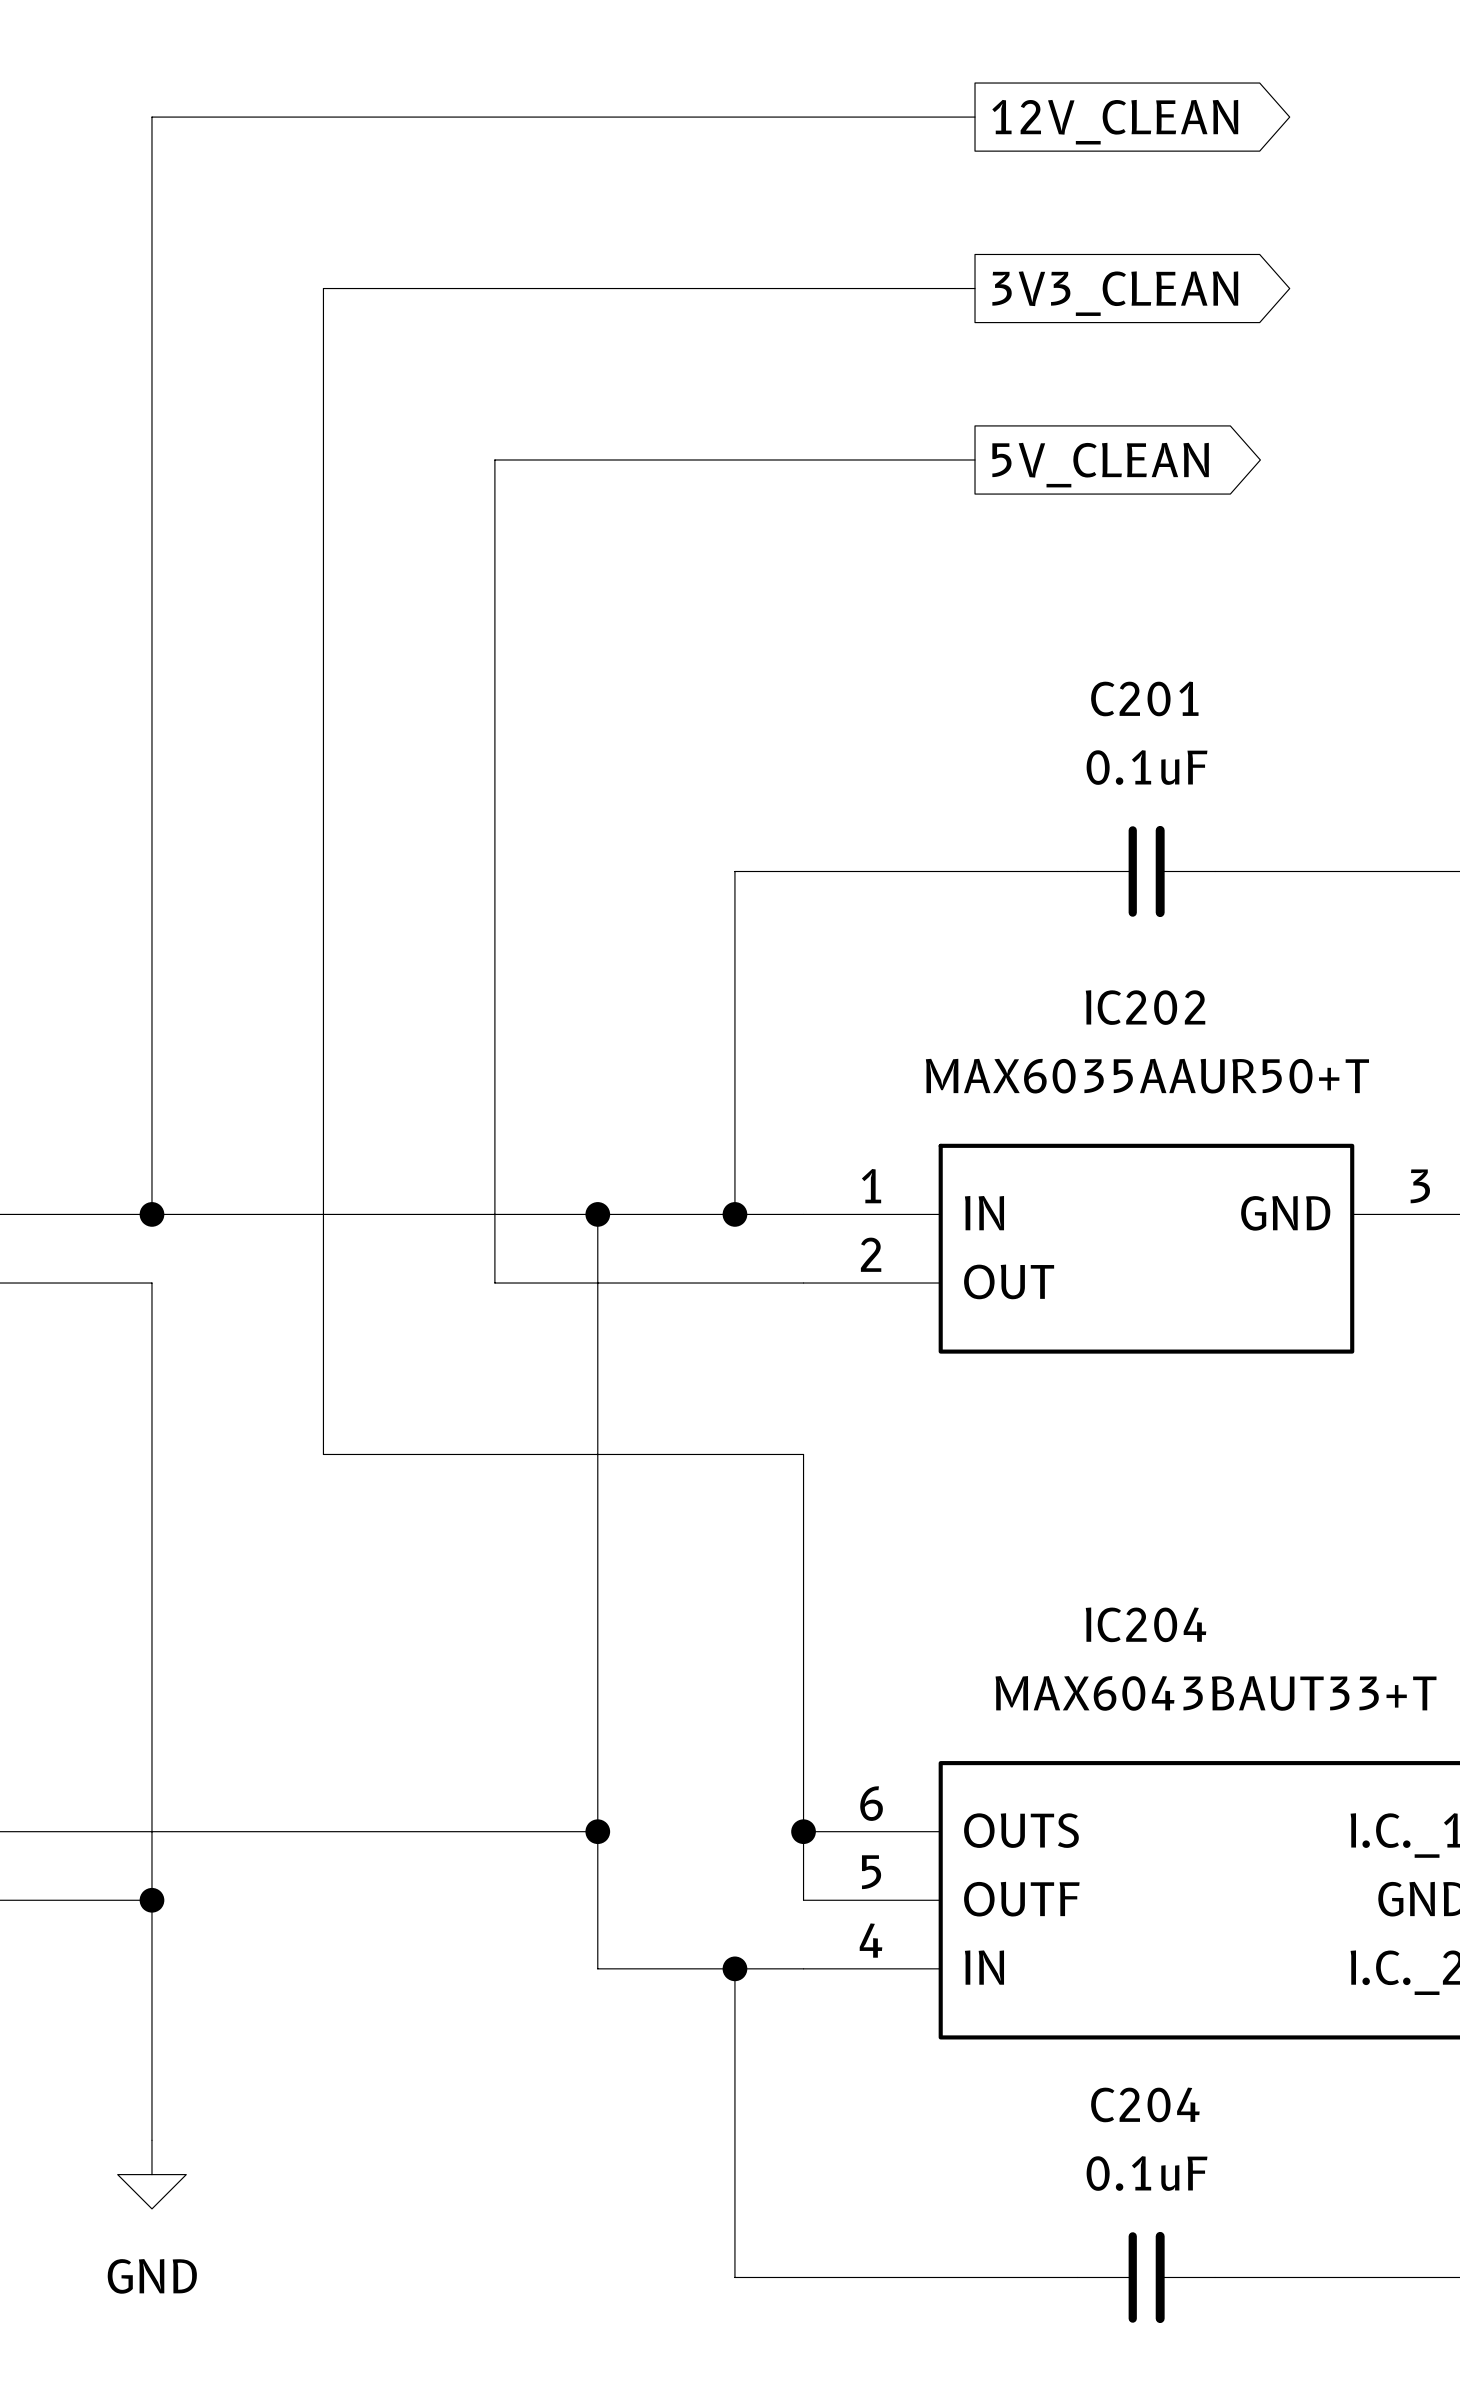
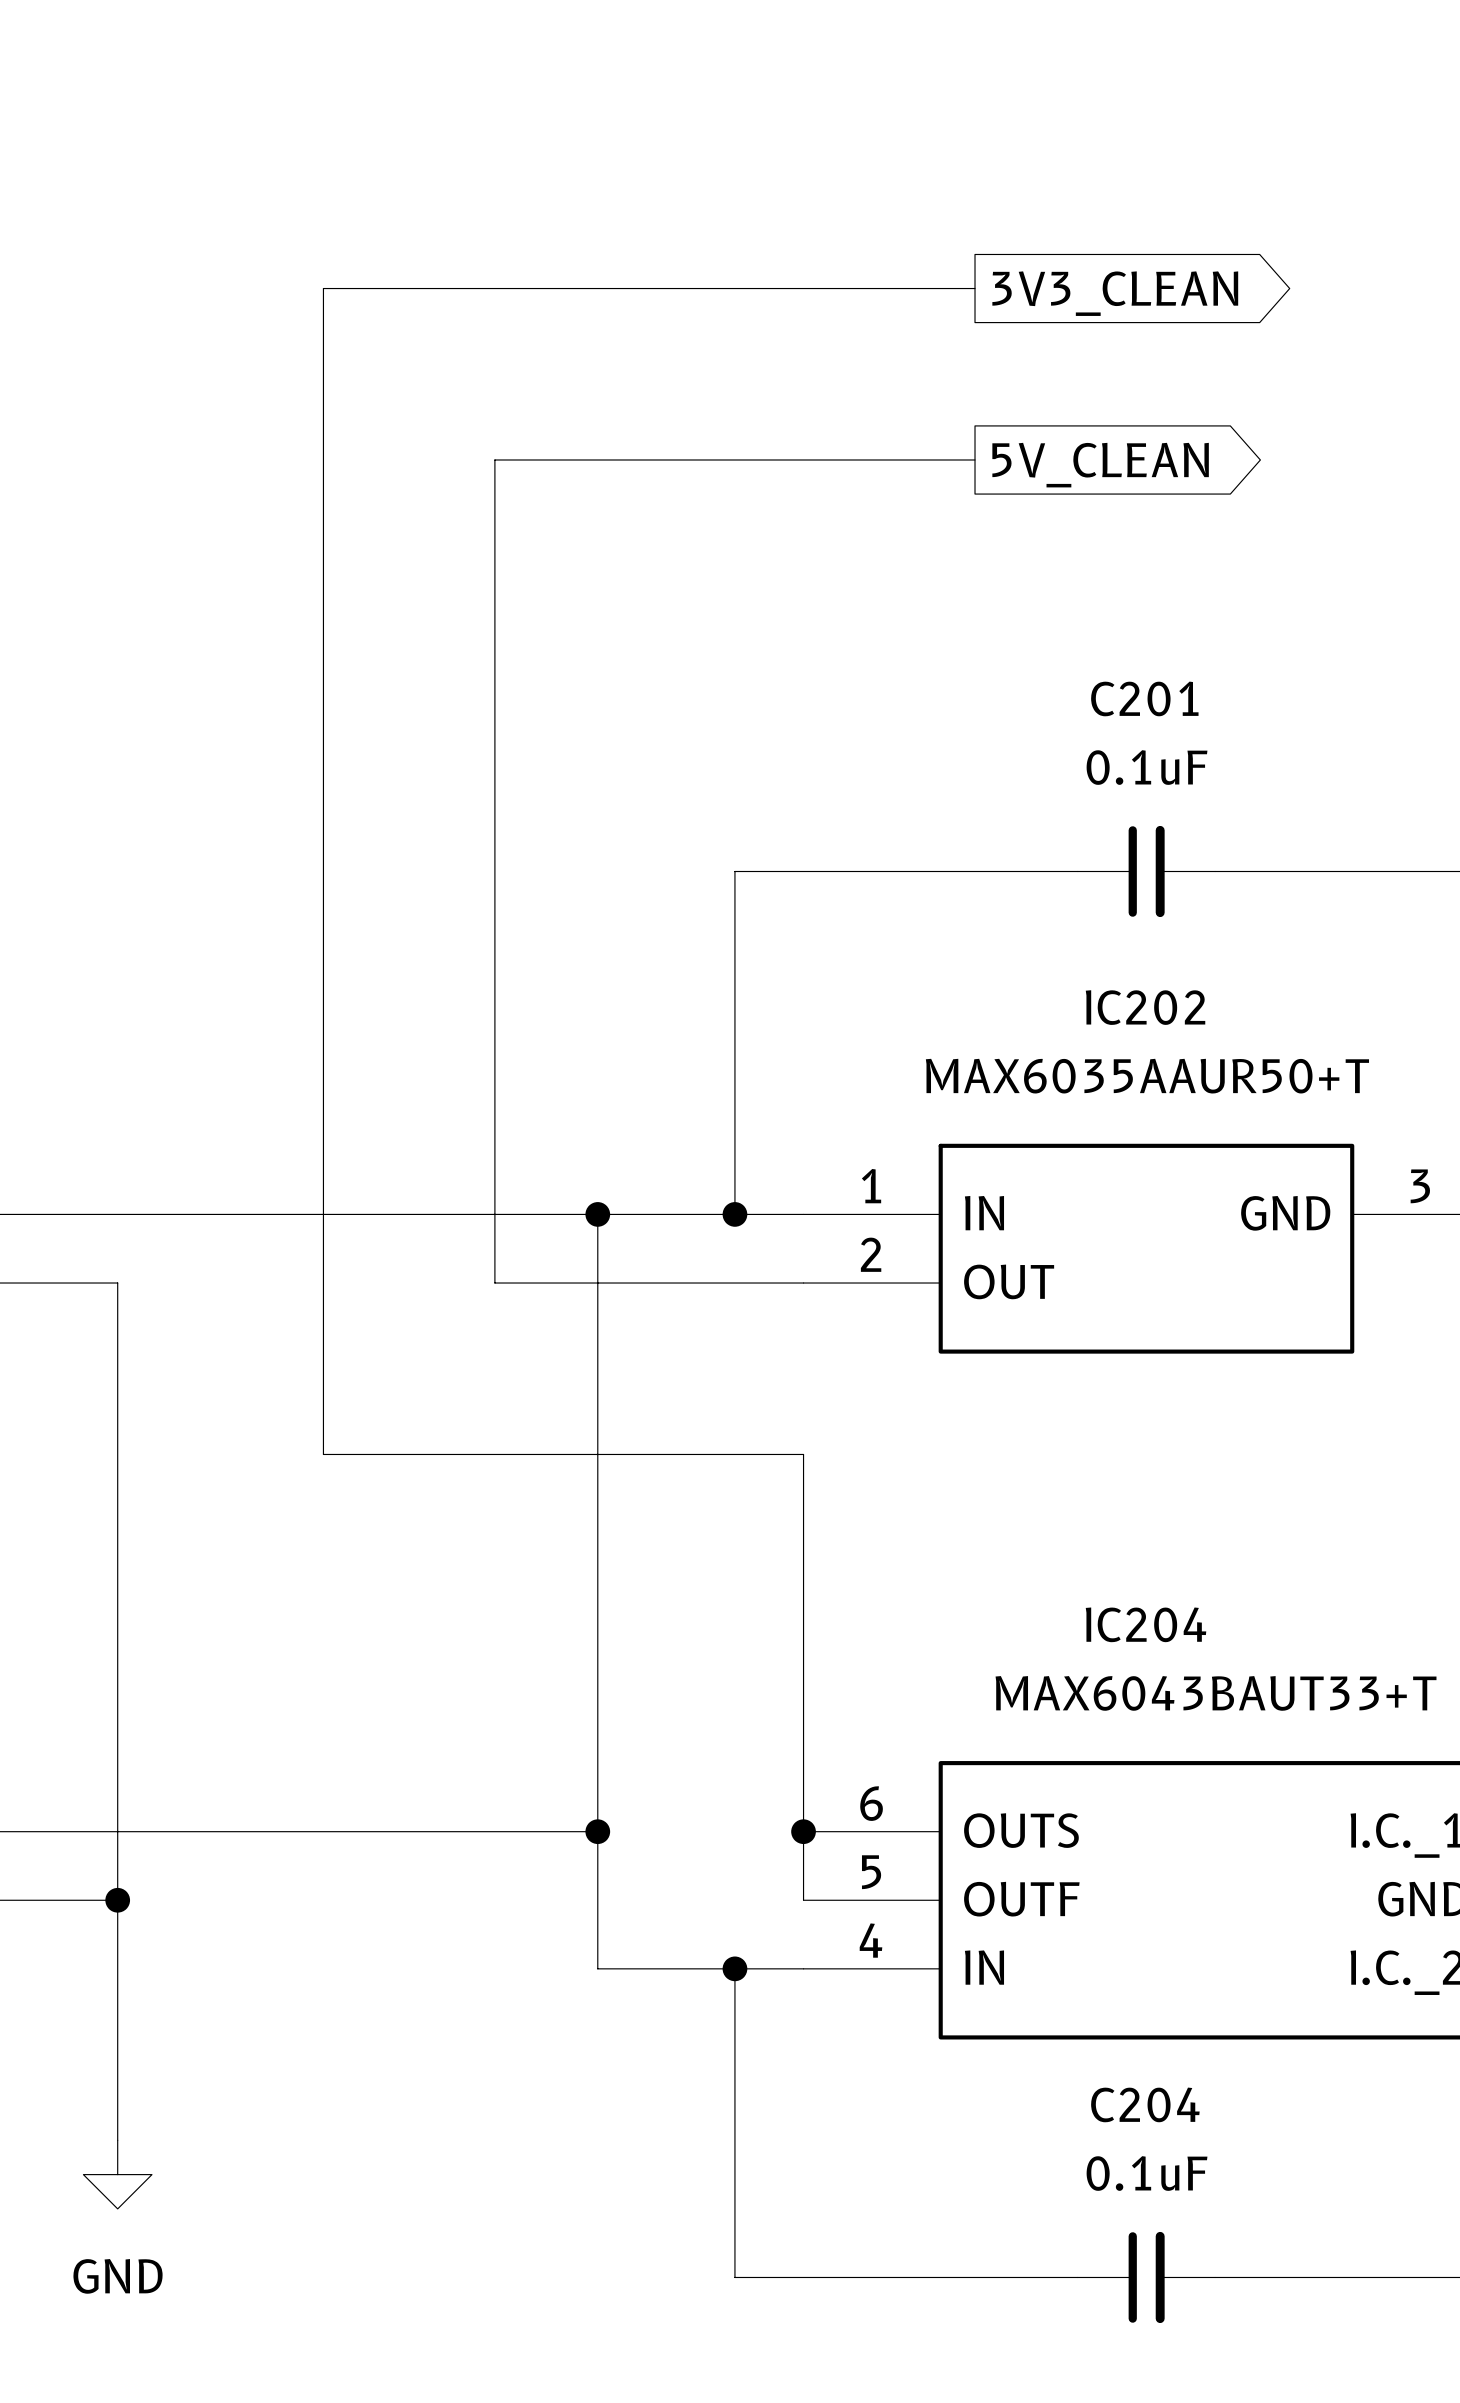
wire: (975, 117) (151, 117) (151, 1214) -> none
global label: 12V_CLEAN (1115, 122) -> none
junction: (151, 1214) -> none
wire: (117, 1283) (151, 1283) (151, 2140) -> (117, 1283) (117, 2140)
wire: (117, 1900) (151, 1900) -> none
junction position: (151, 1900) -> (117, 1900)
power symbol position: GND (151, 2174) -> GND (117, 2174)

